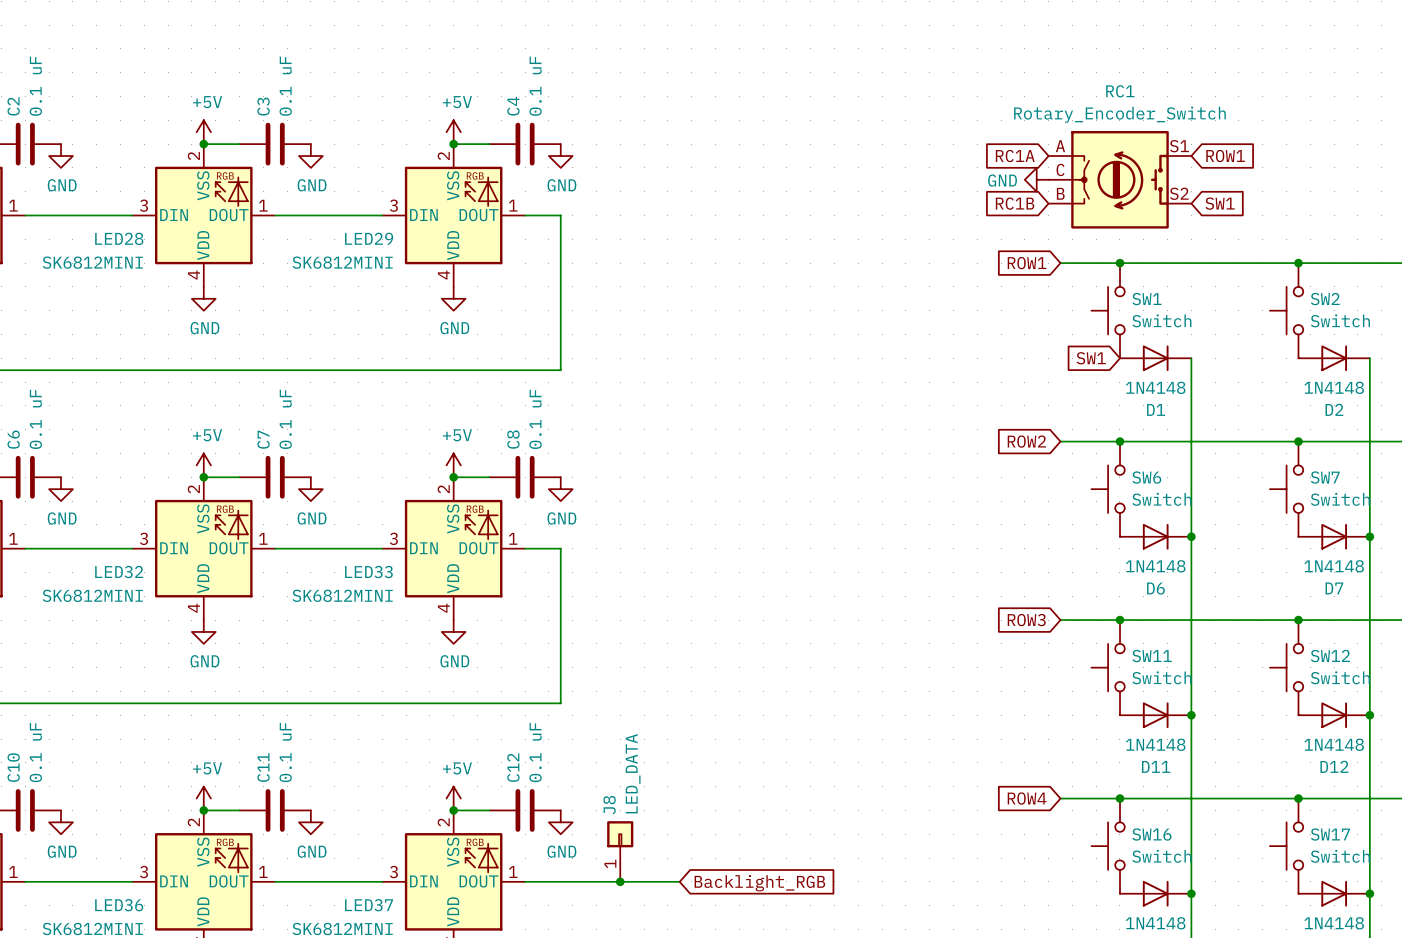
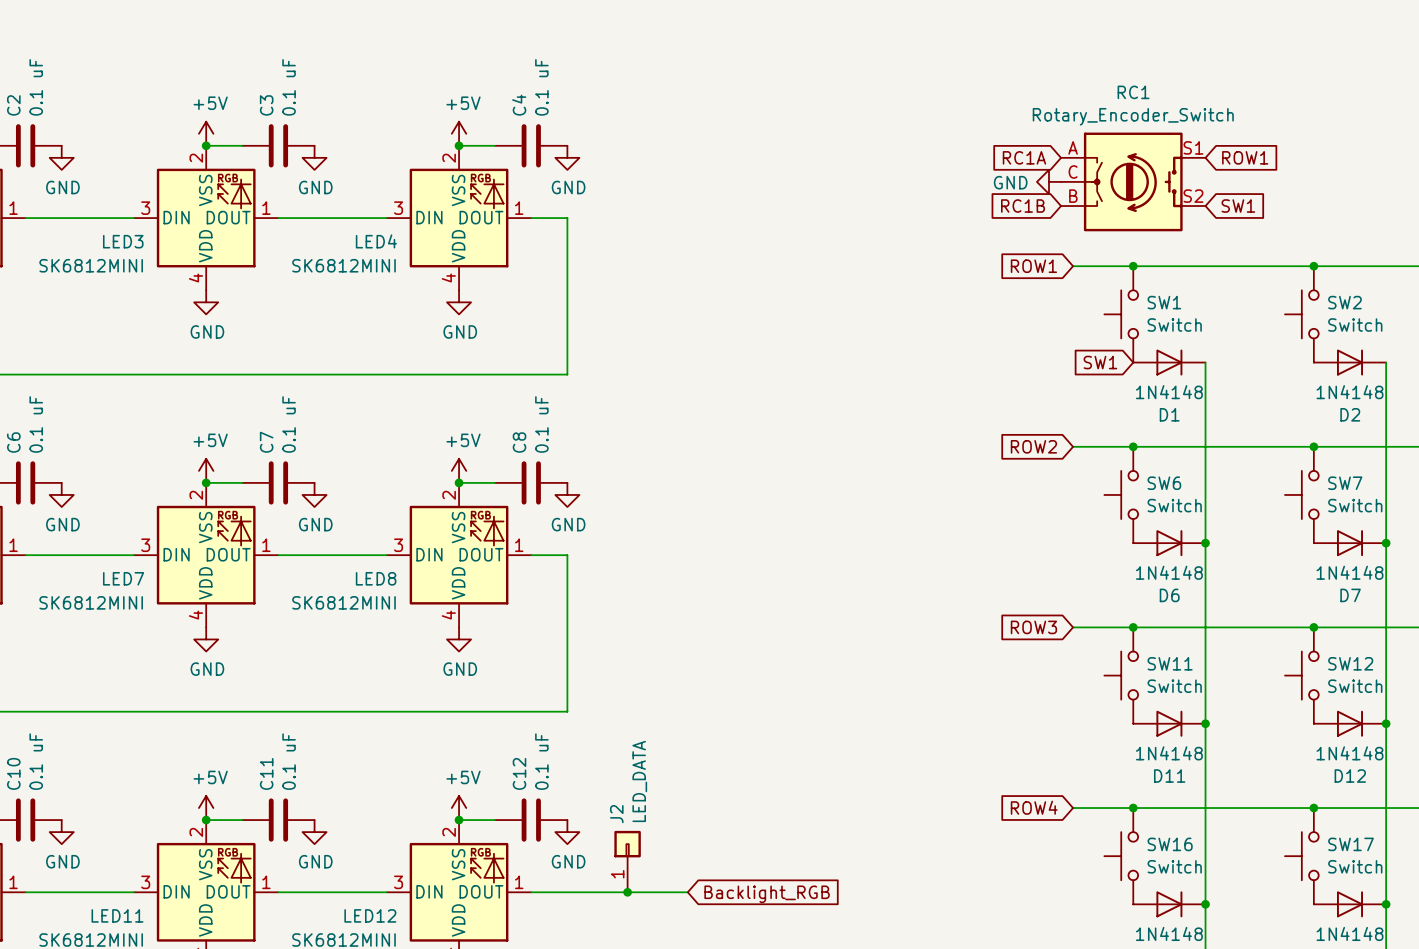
LED28 name: LED28 (119, 238) -> LED3 (123, 241)
LED29 name: LED29 (369, 238) -> LED4 (376, 241)
LED32 name: LED32 (119, 572) -> LED7 (123, 578)
LED33 name: LED33 (368, 572) -> LED8 (376, 578)
J8 name: J8 (609, 805) -> J2 (616, 814)
LED36 name: LED36 (119, 905) -> LED11 (117, 915)
LED37 name: LED37 (369, 905) -> LED12 (370, 915)

